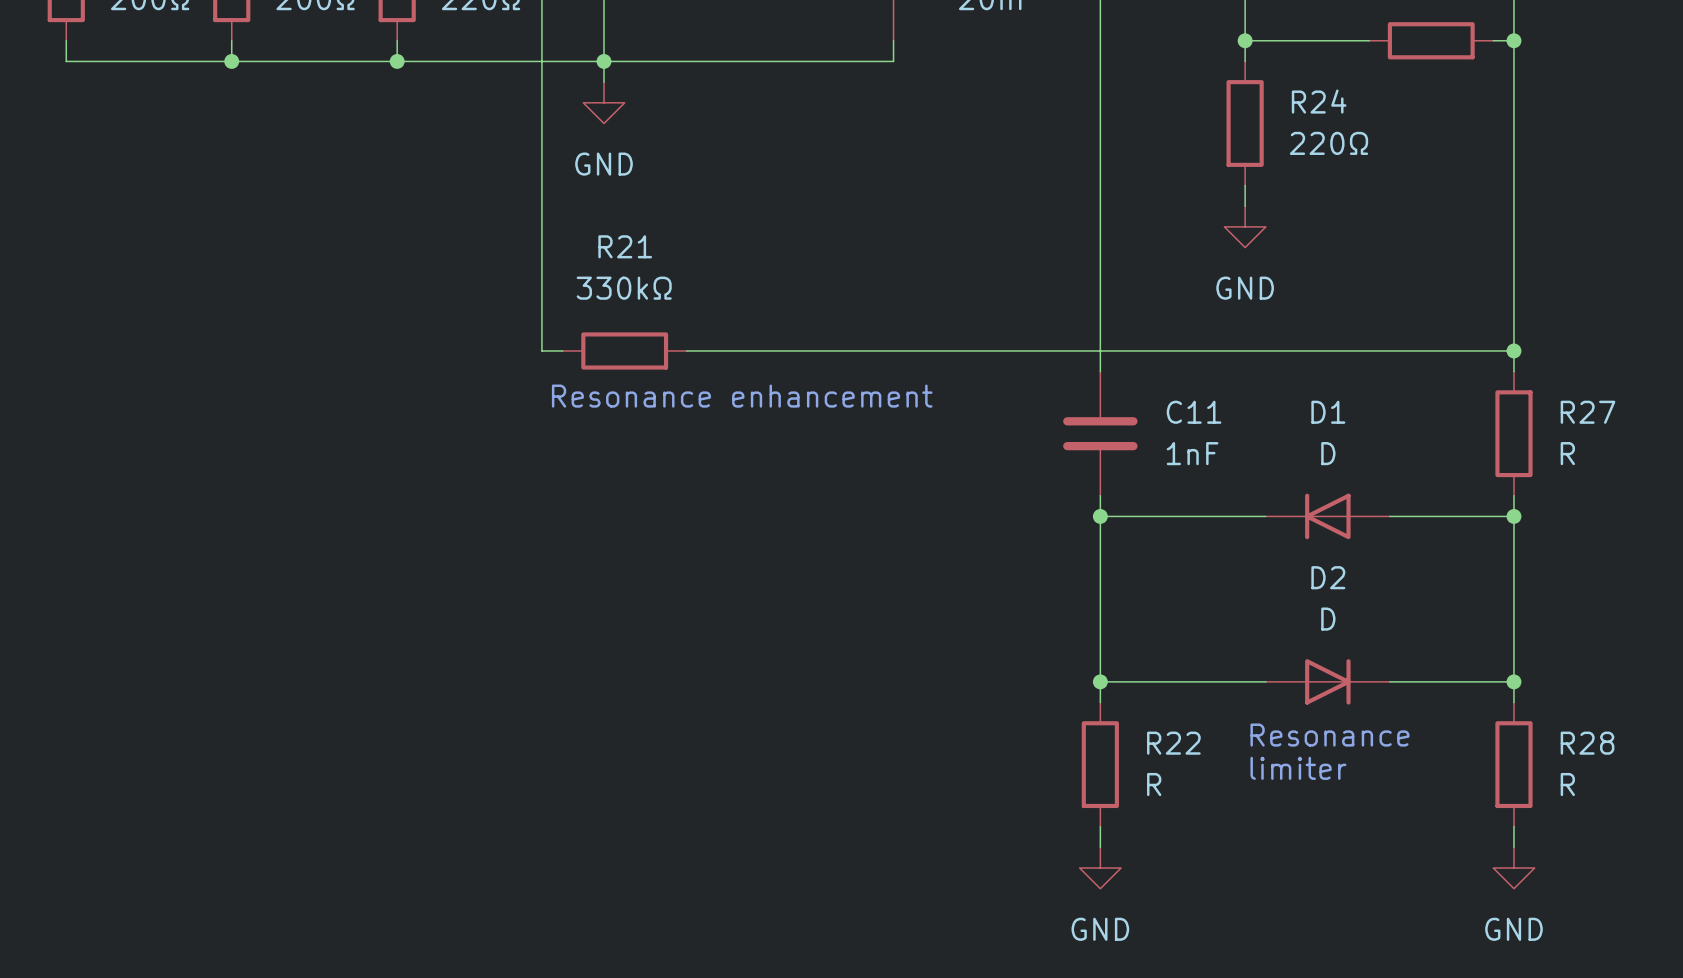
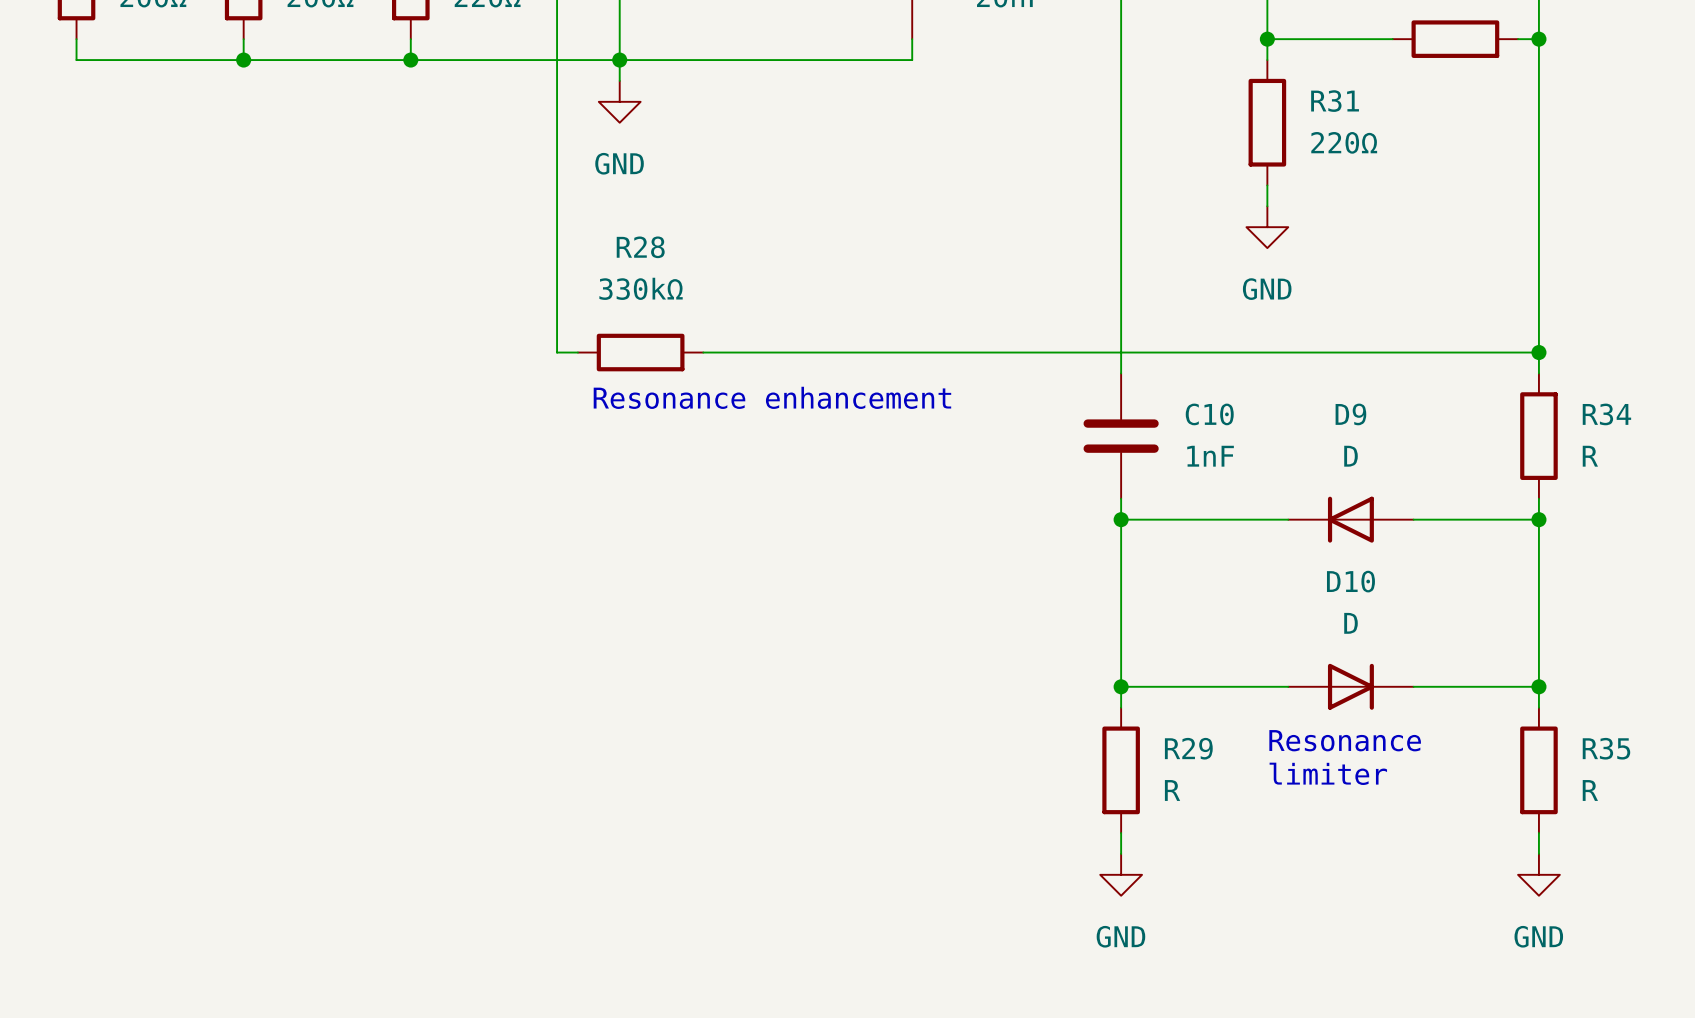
R24 name: R24 (1319, 101) -> R31 (1335, 101)
R21 name: R21 (625, 246) -> R28 (640, 247)
C11 name: C11 (1194, 412) -> C10 (1209, 414)
D1 name: D1 (1328, 412) -> D9 (1350, 414)
R27 name: R27 (1588, 412) -> R34 (1606, 414)
D2 name: D2 (1328, 577) -> D10 (1350, 581)
R22 name: R22 (1173, 743) -> R29 (1188, 748)
R28 name: R28 (1587, 743) -> R35 (1606, 748)

